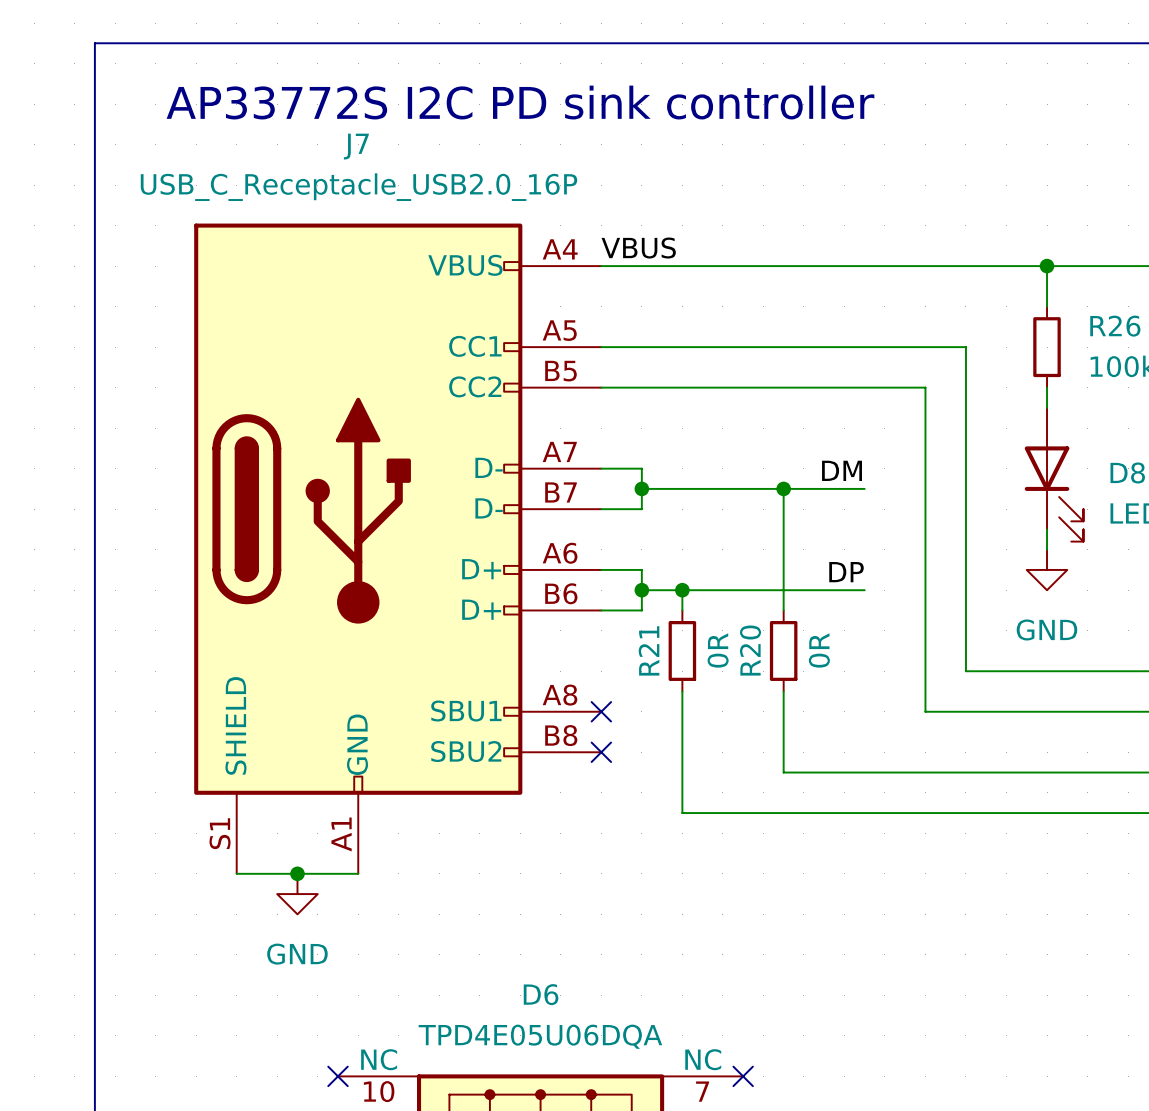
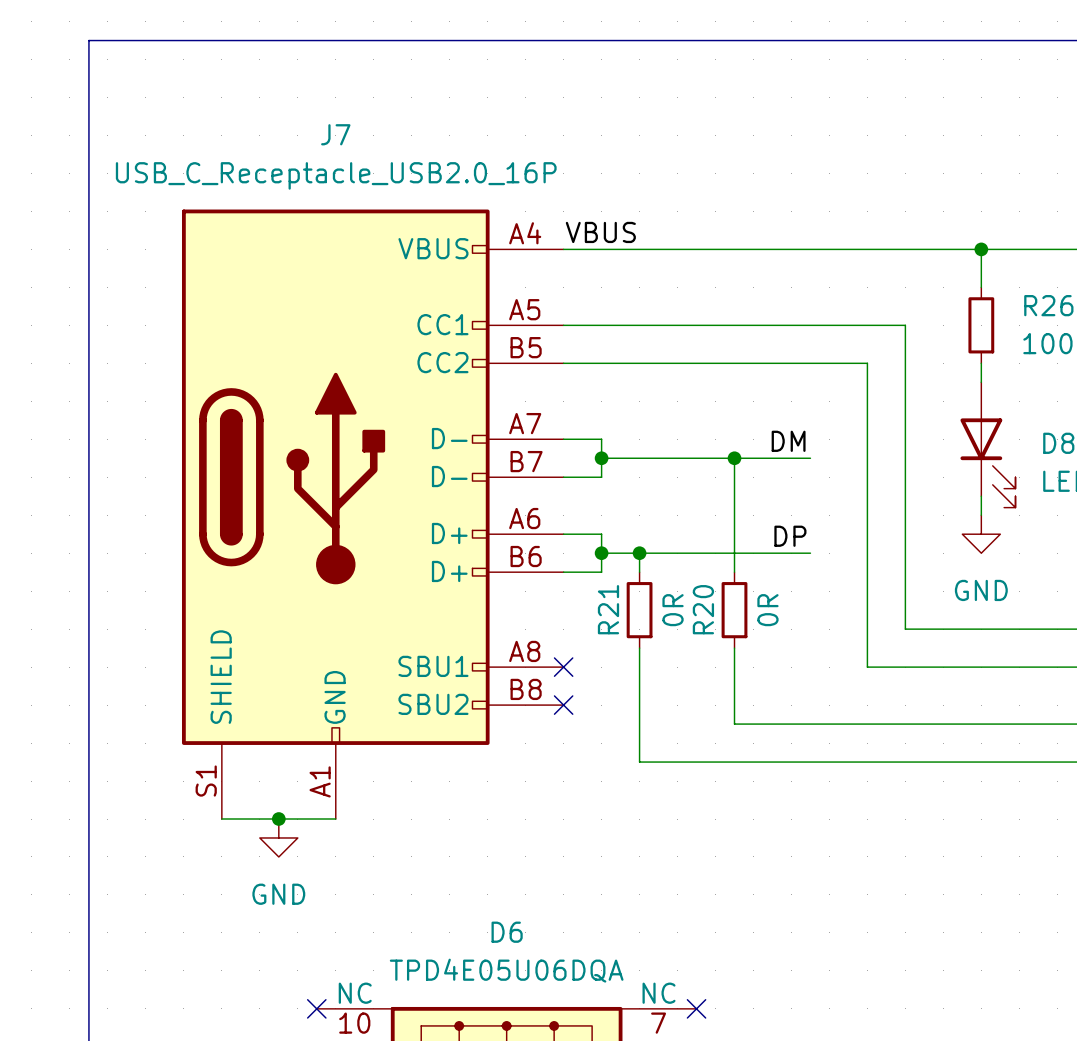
text: AP33772S I2C PD sink controller (520, 102) -> none

